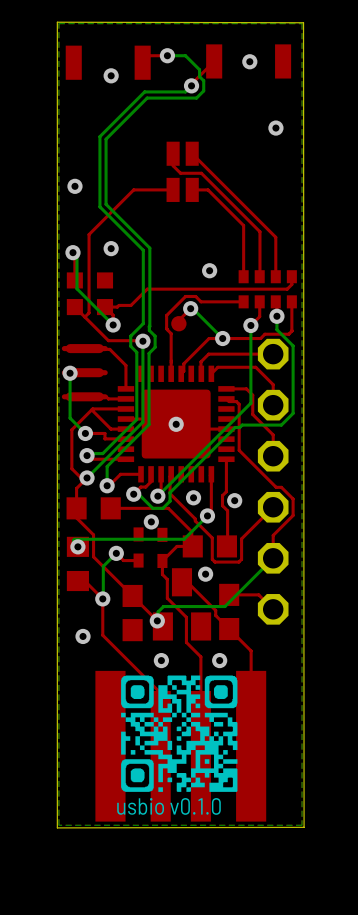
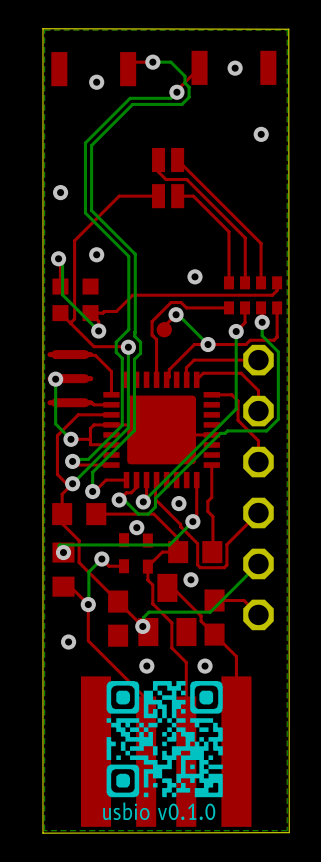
top track: (226, 398) (239, 404) (239, 450) (276, 487) (281, 487) (293, 499) (293, 515) (273, 535) (273, 558) -> none
top track: (91, 409) (110, 429) (125, 429) -> none
top track: none -> (111, 424) (94, 424) (90, 428) (90, 439)
via: (176, 424) -> none
via: (234, 500) -> none

